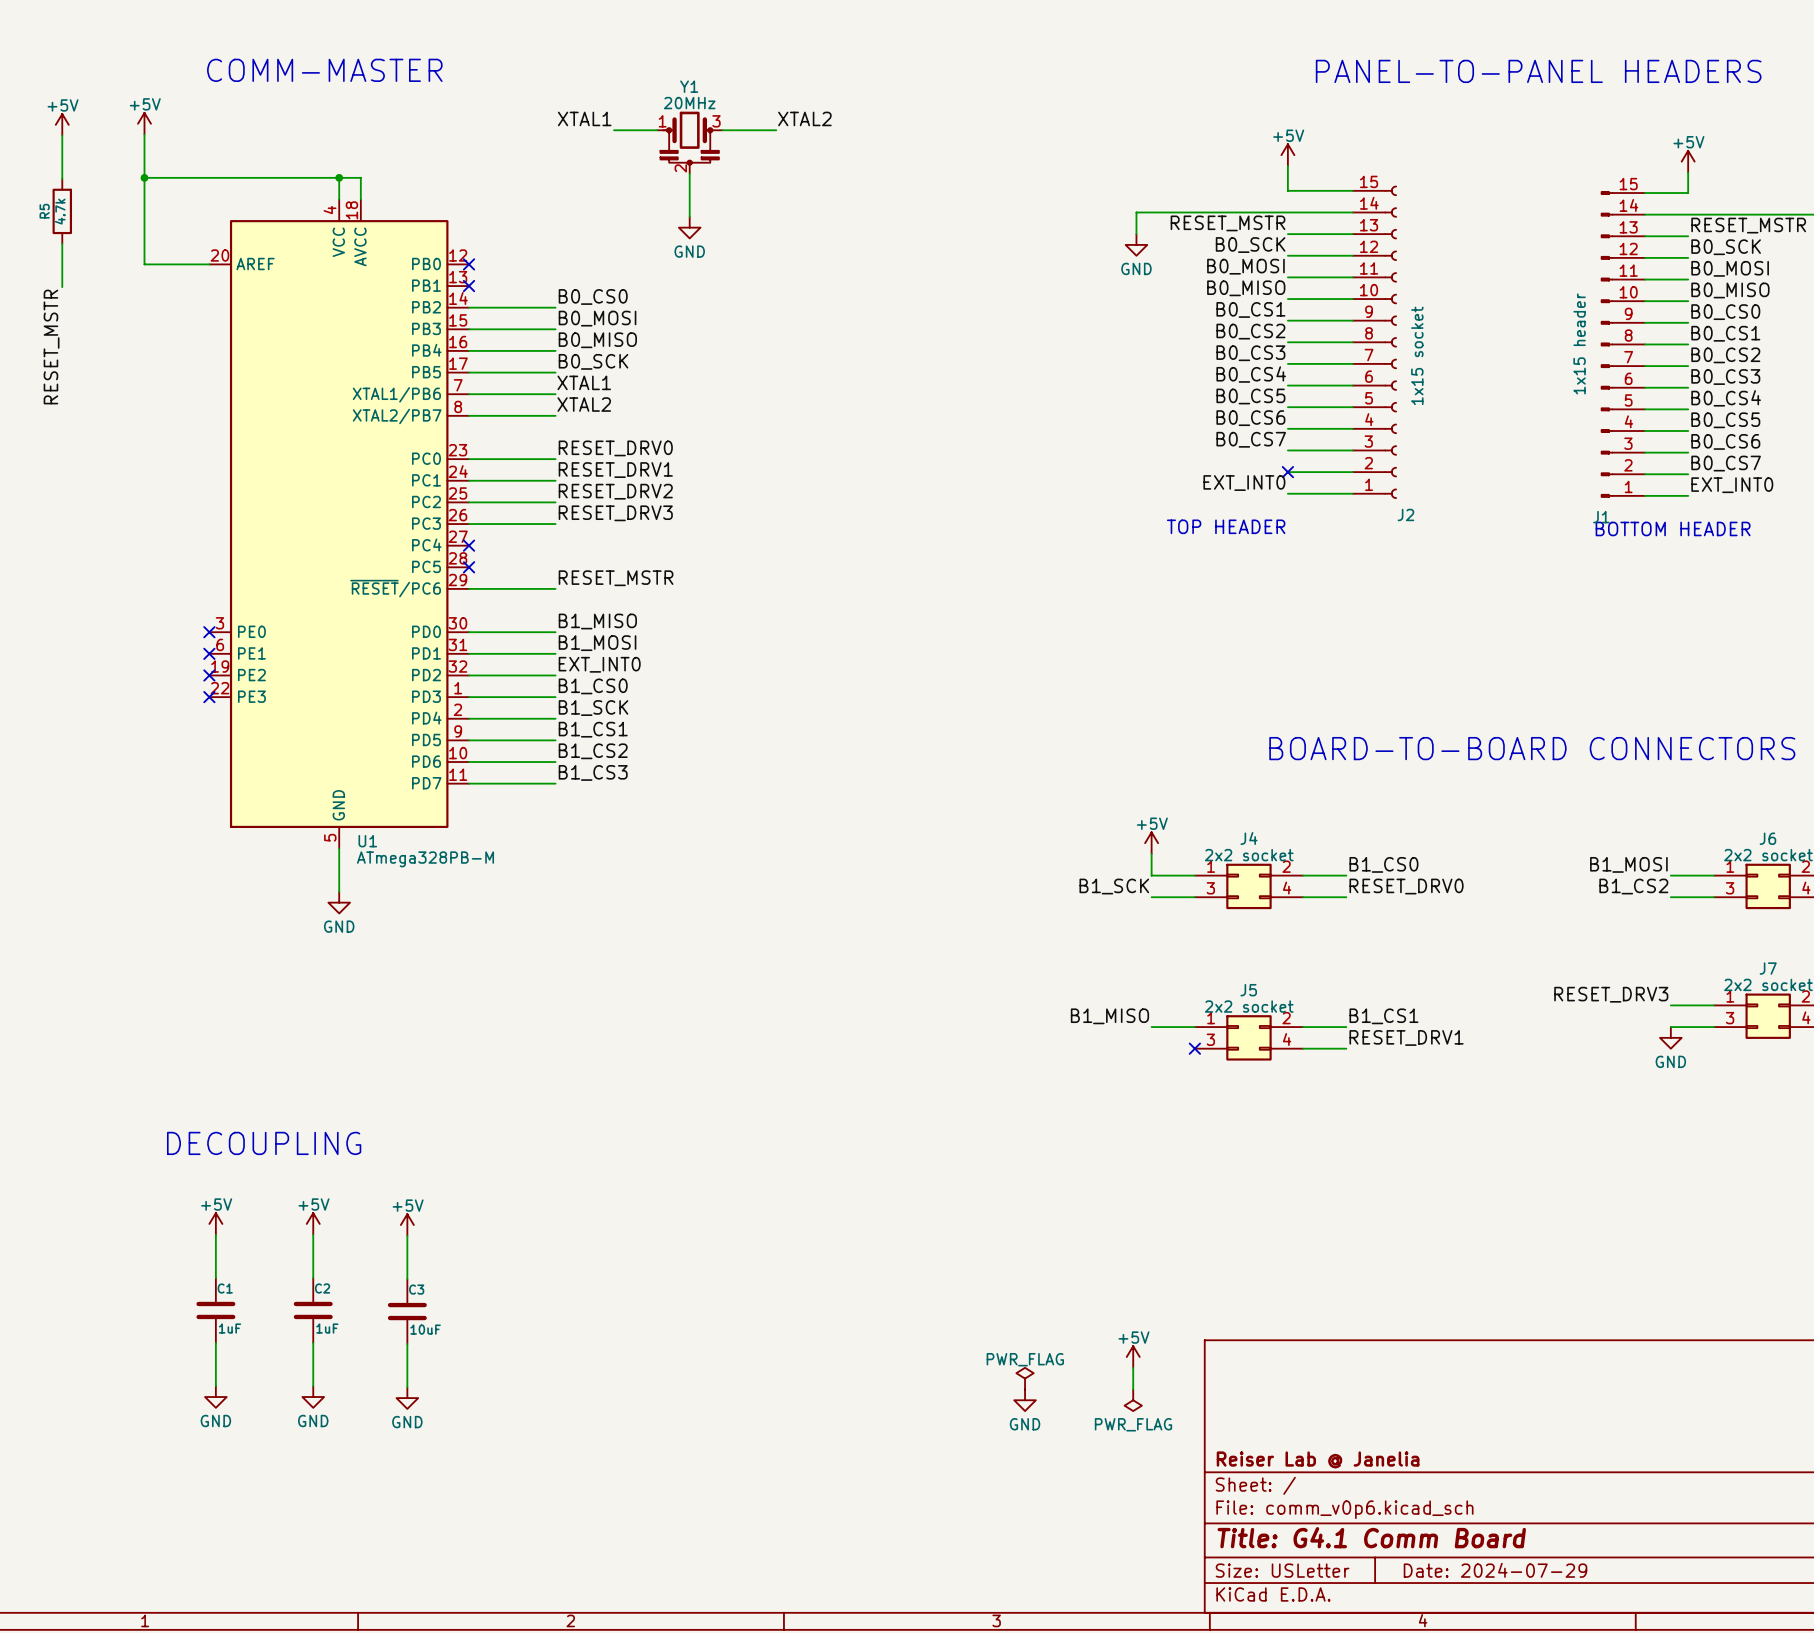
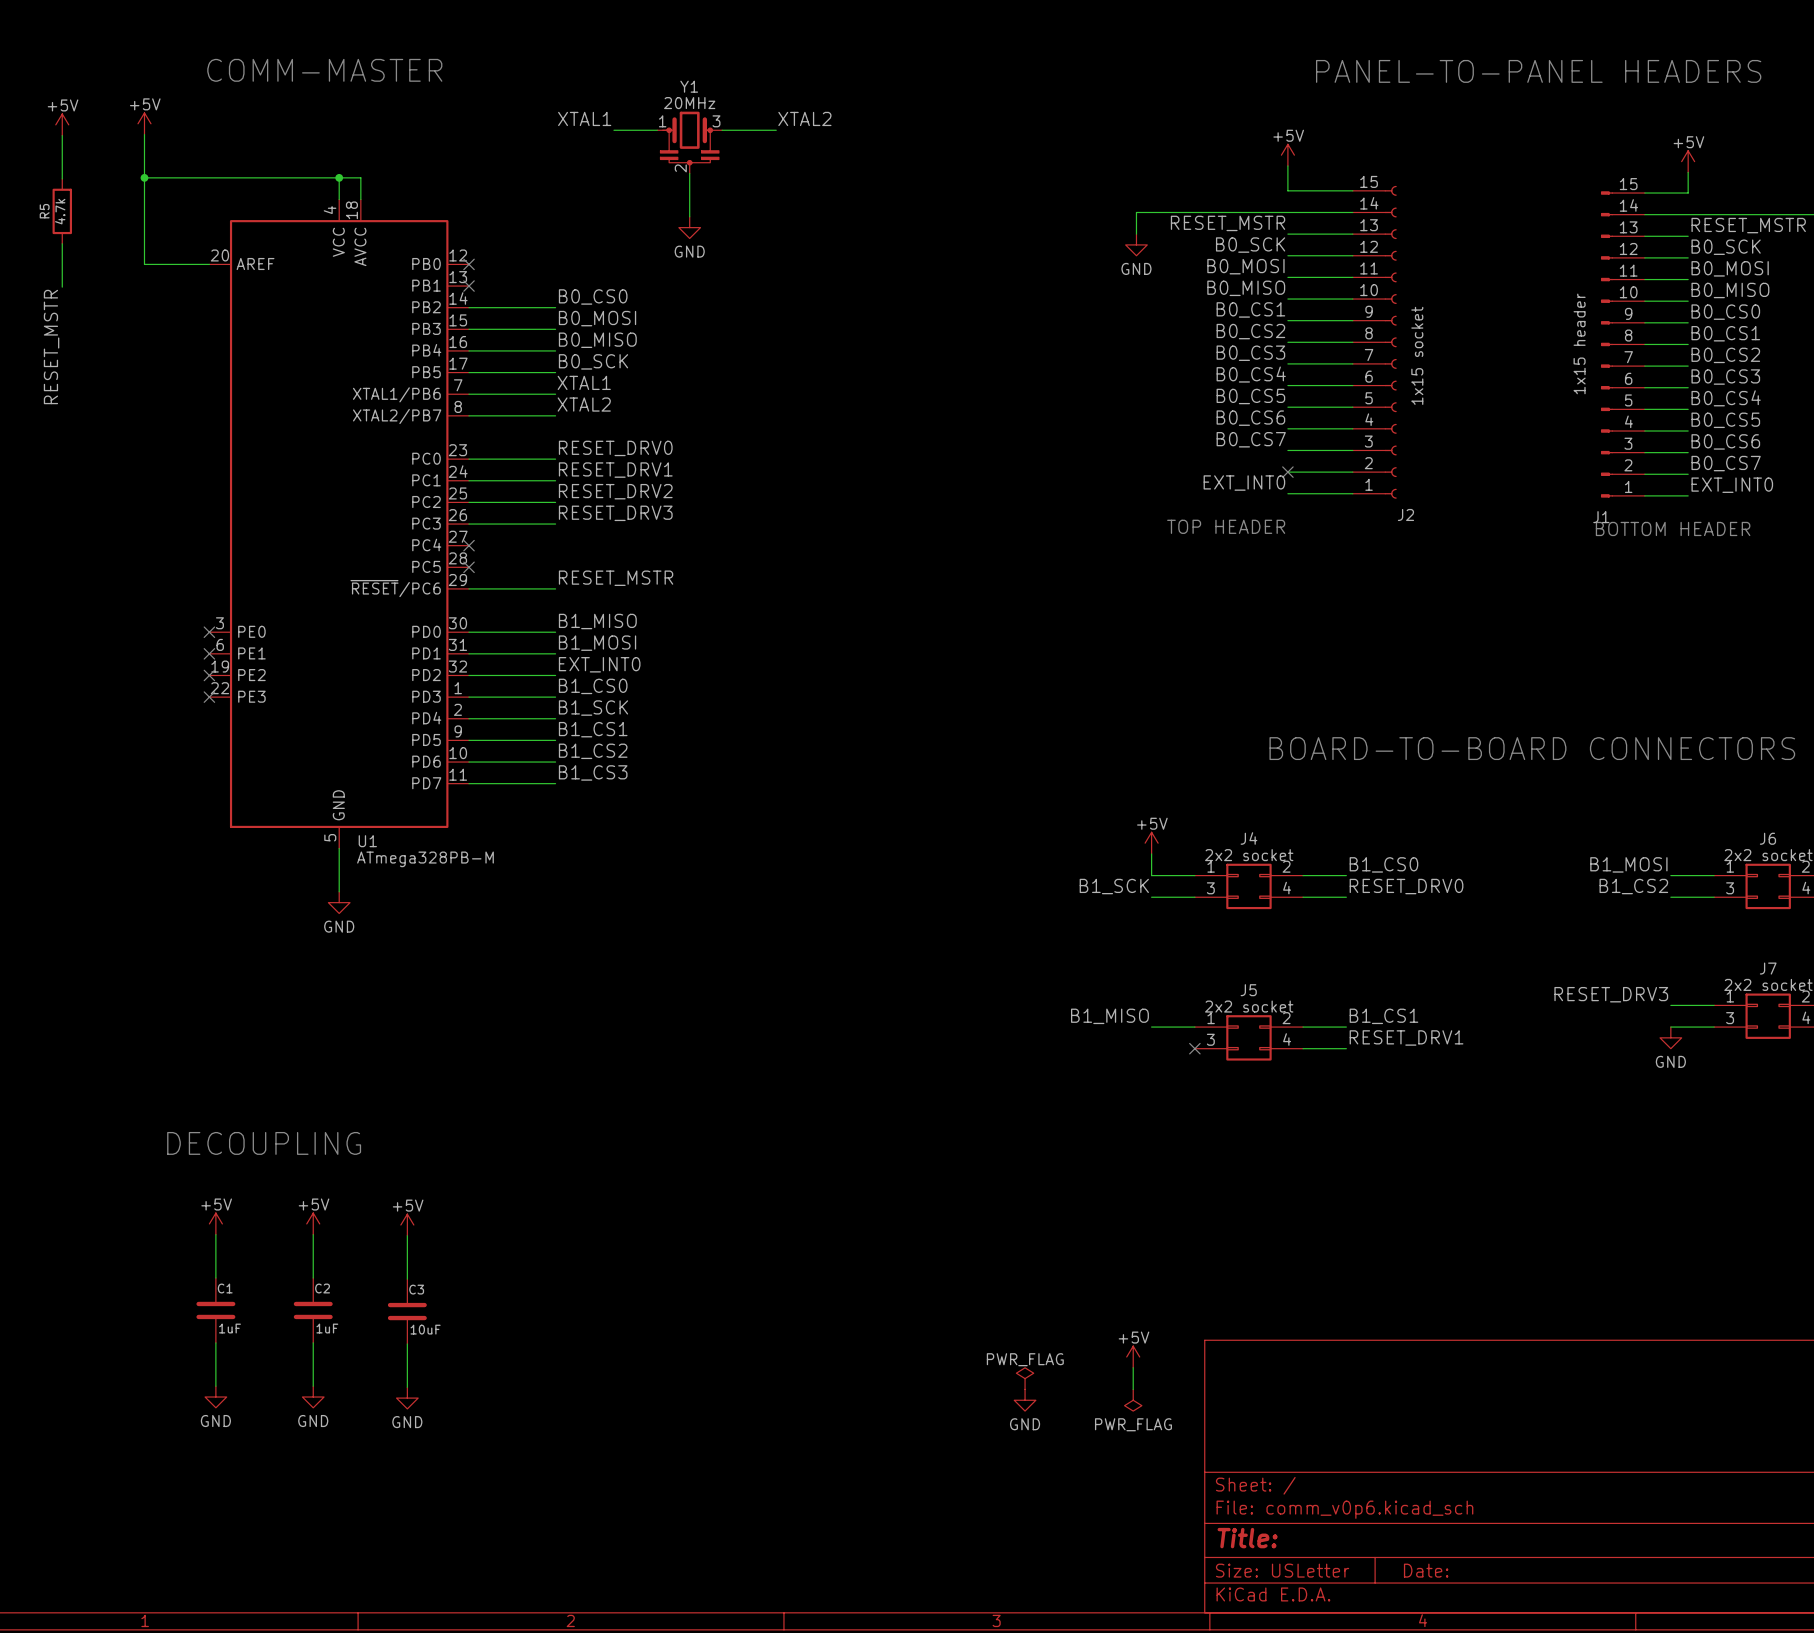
title block: Reiser Lab @ Janelia (1318, 1459) -> none
title block: Title: G4.1 Comm Board (1371, 1537) -> Title: (1247, 1538)
title block: Date: 2024-07-29 (1495, 1570) -> Date: (1426, 1570)

